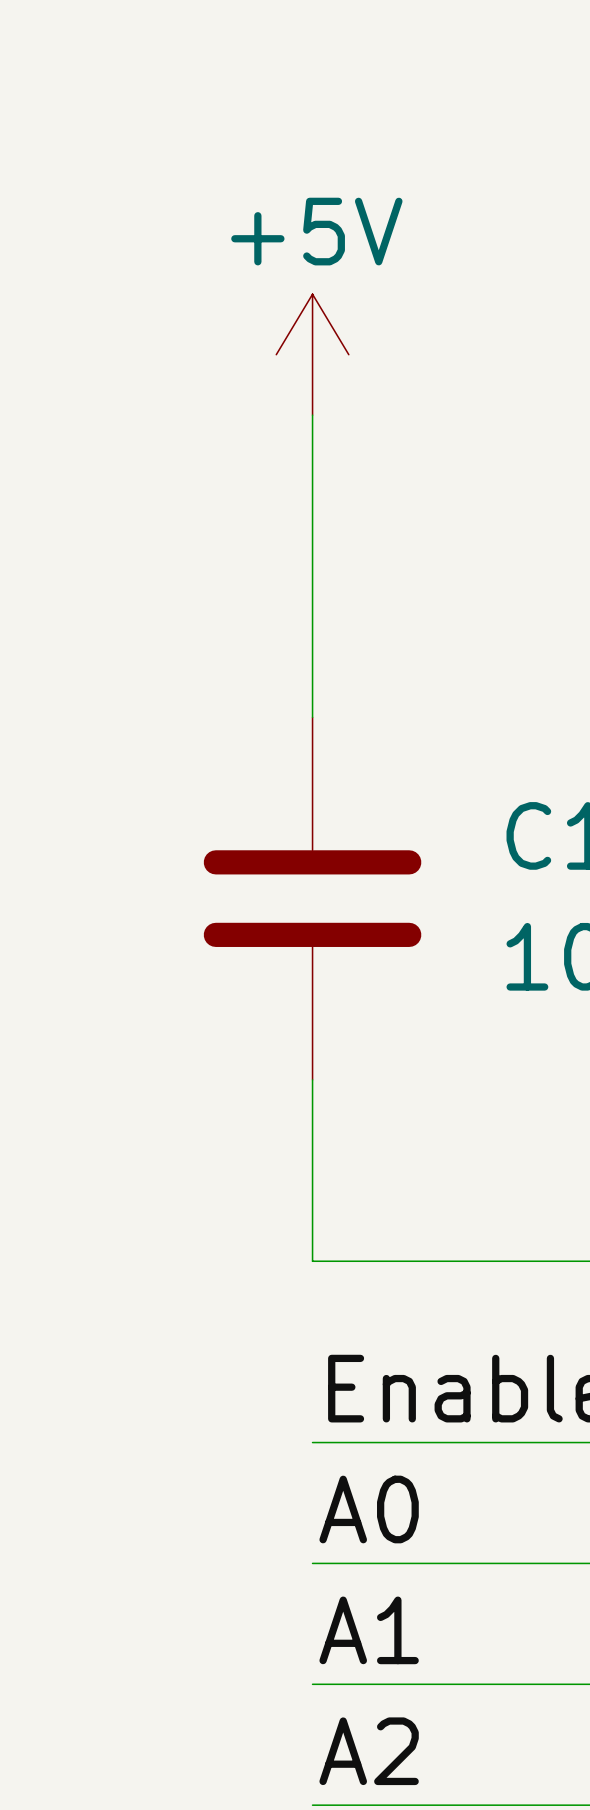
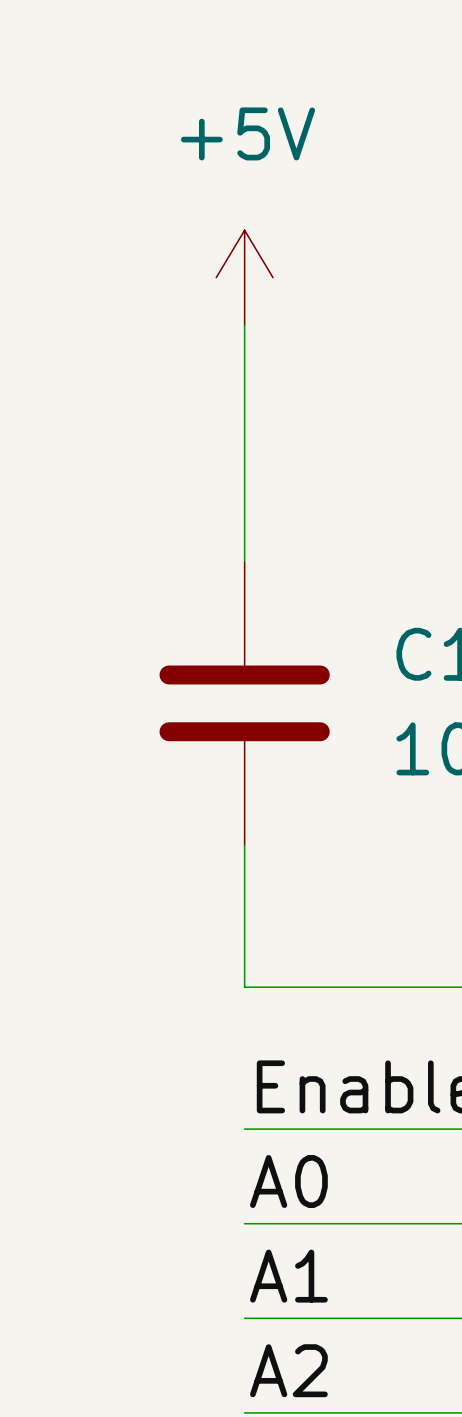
power symbol text position: +5V (316, 231) -> +5V (248, 133)

